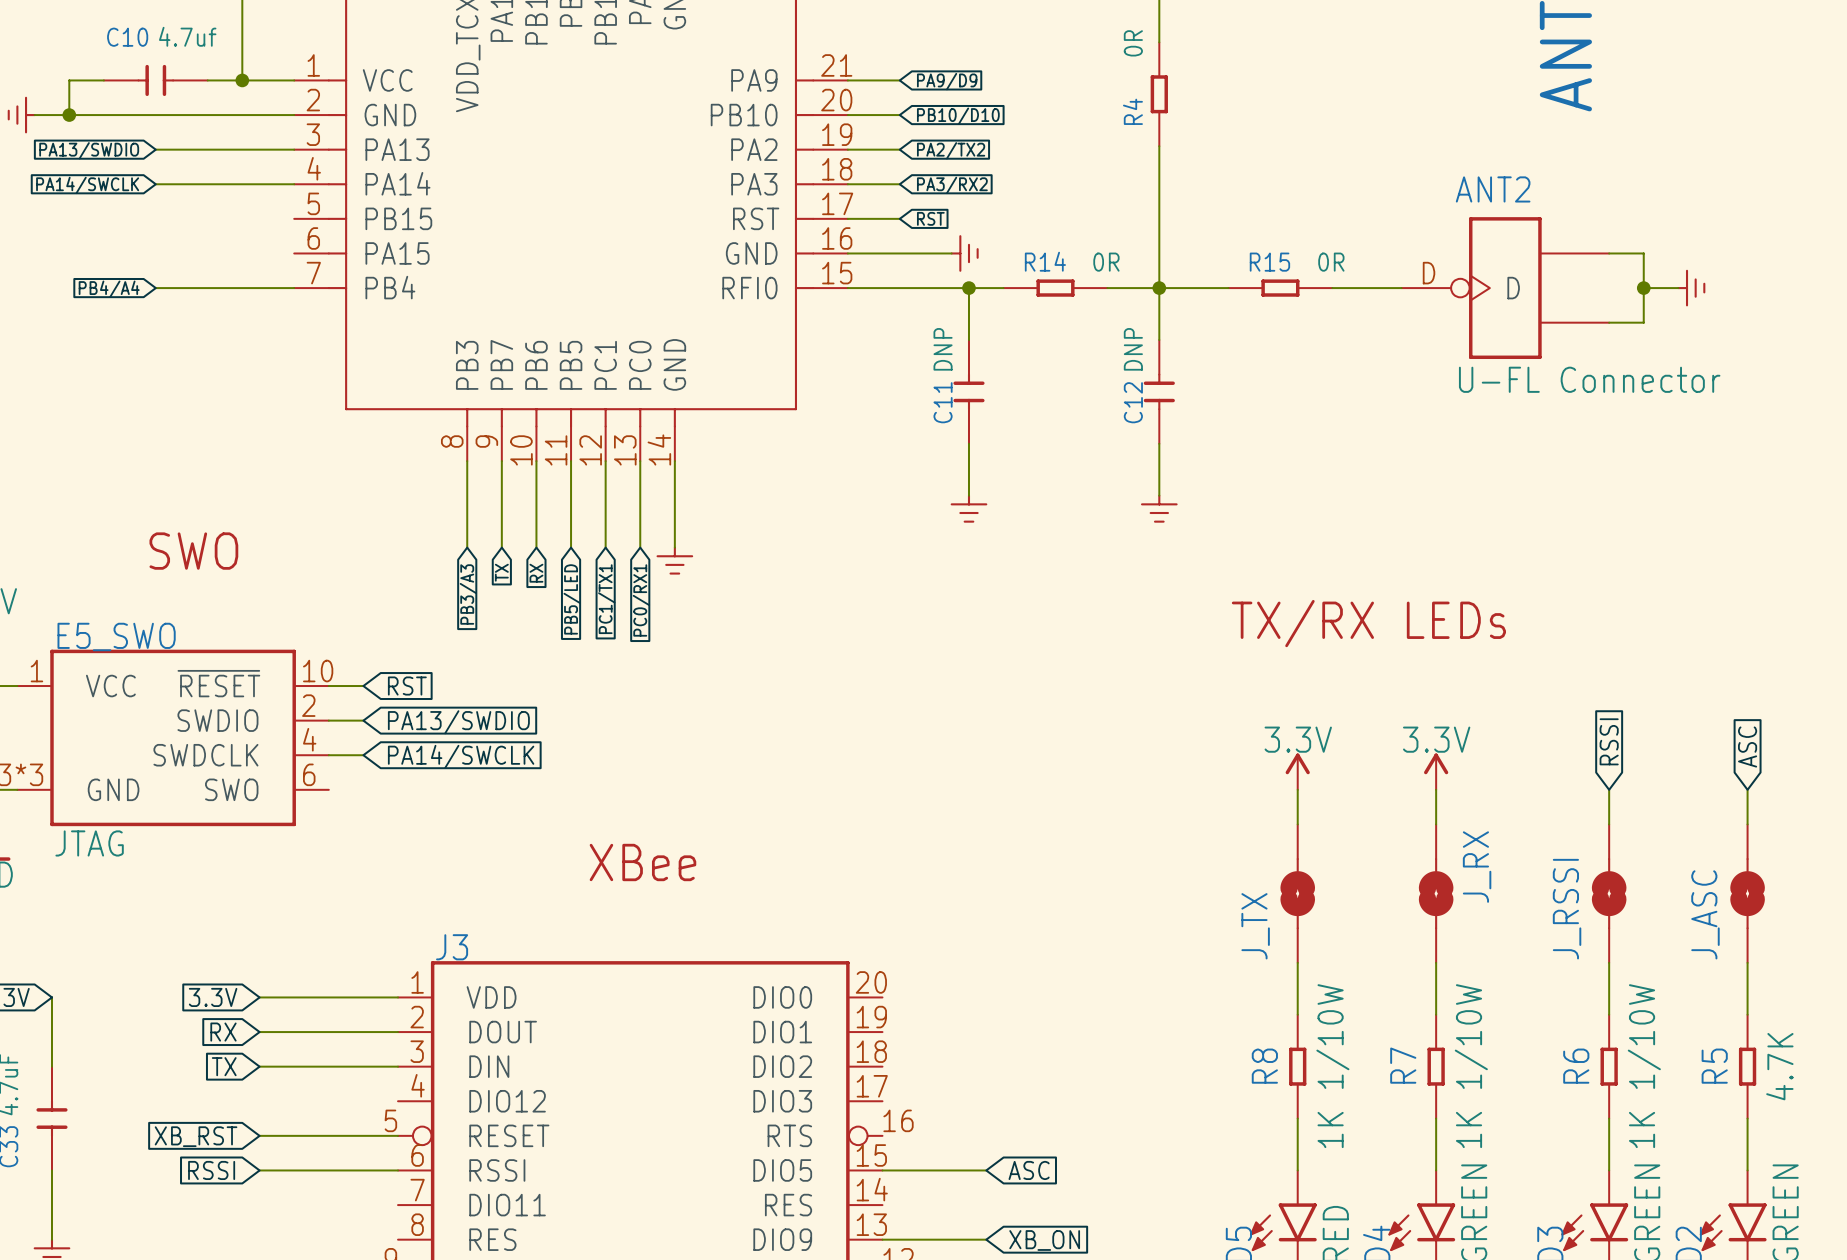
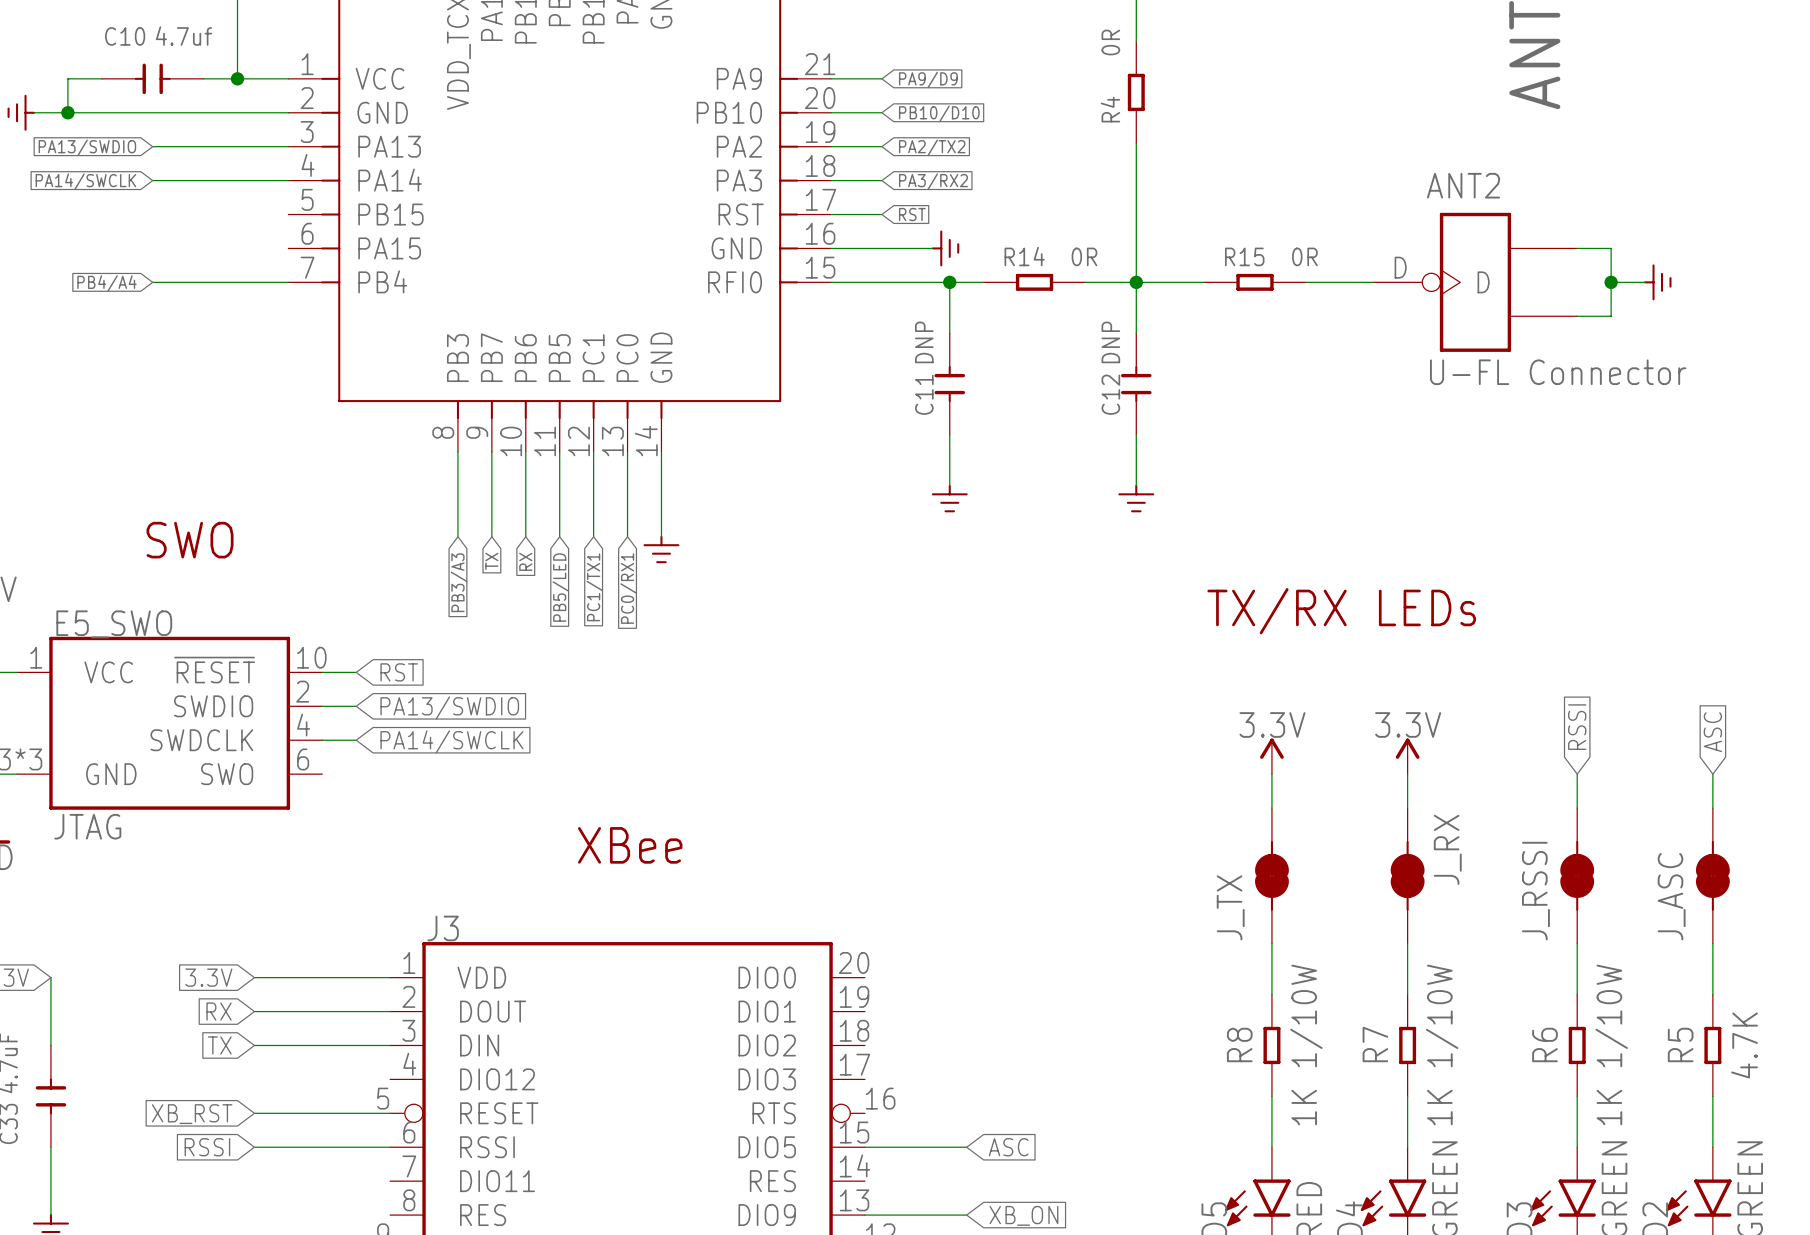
J_TX symbol: [1280, 824, 1316, 963] -> [1255, 808, 1289, 944]
J_RX symbol: [1418, 824, 1454, 963] -> [1390, 808, 1425, 944]
J_RSSI symbol: [1591, 824, 1627, 963] -> [1560, 808, 1595, 944]
J_ASC symbol: [1730, 824, 1765, 963] -> [1695, 808, 1730, 944]

